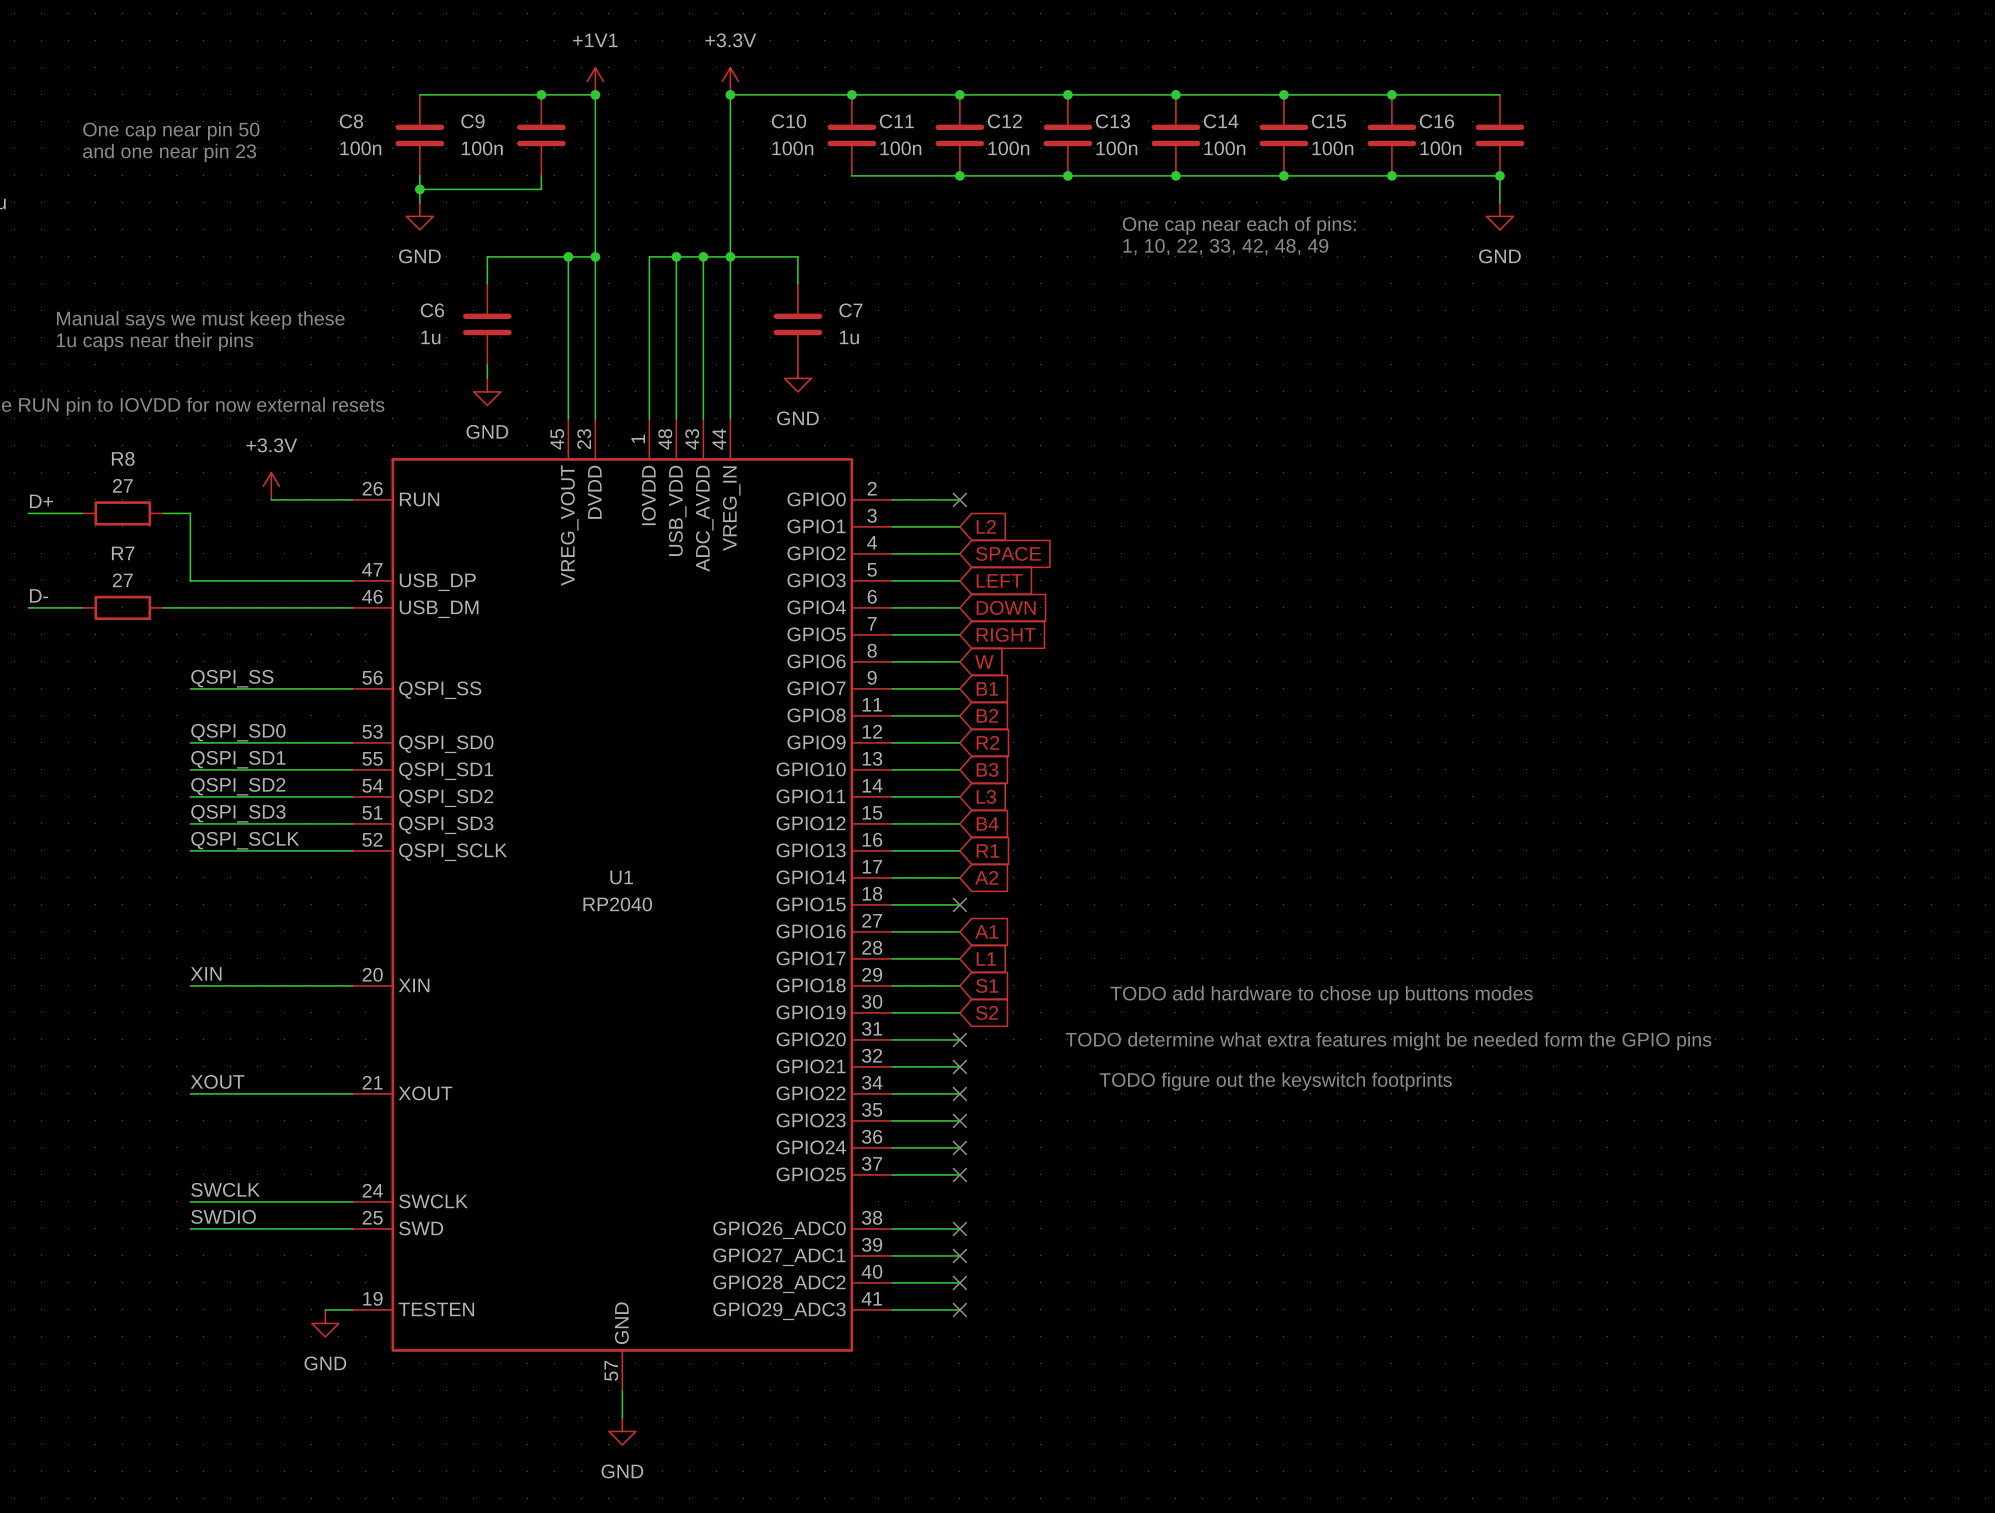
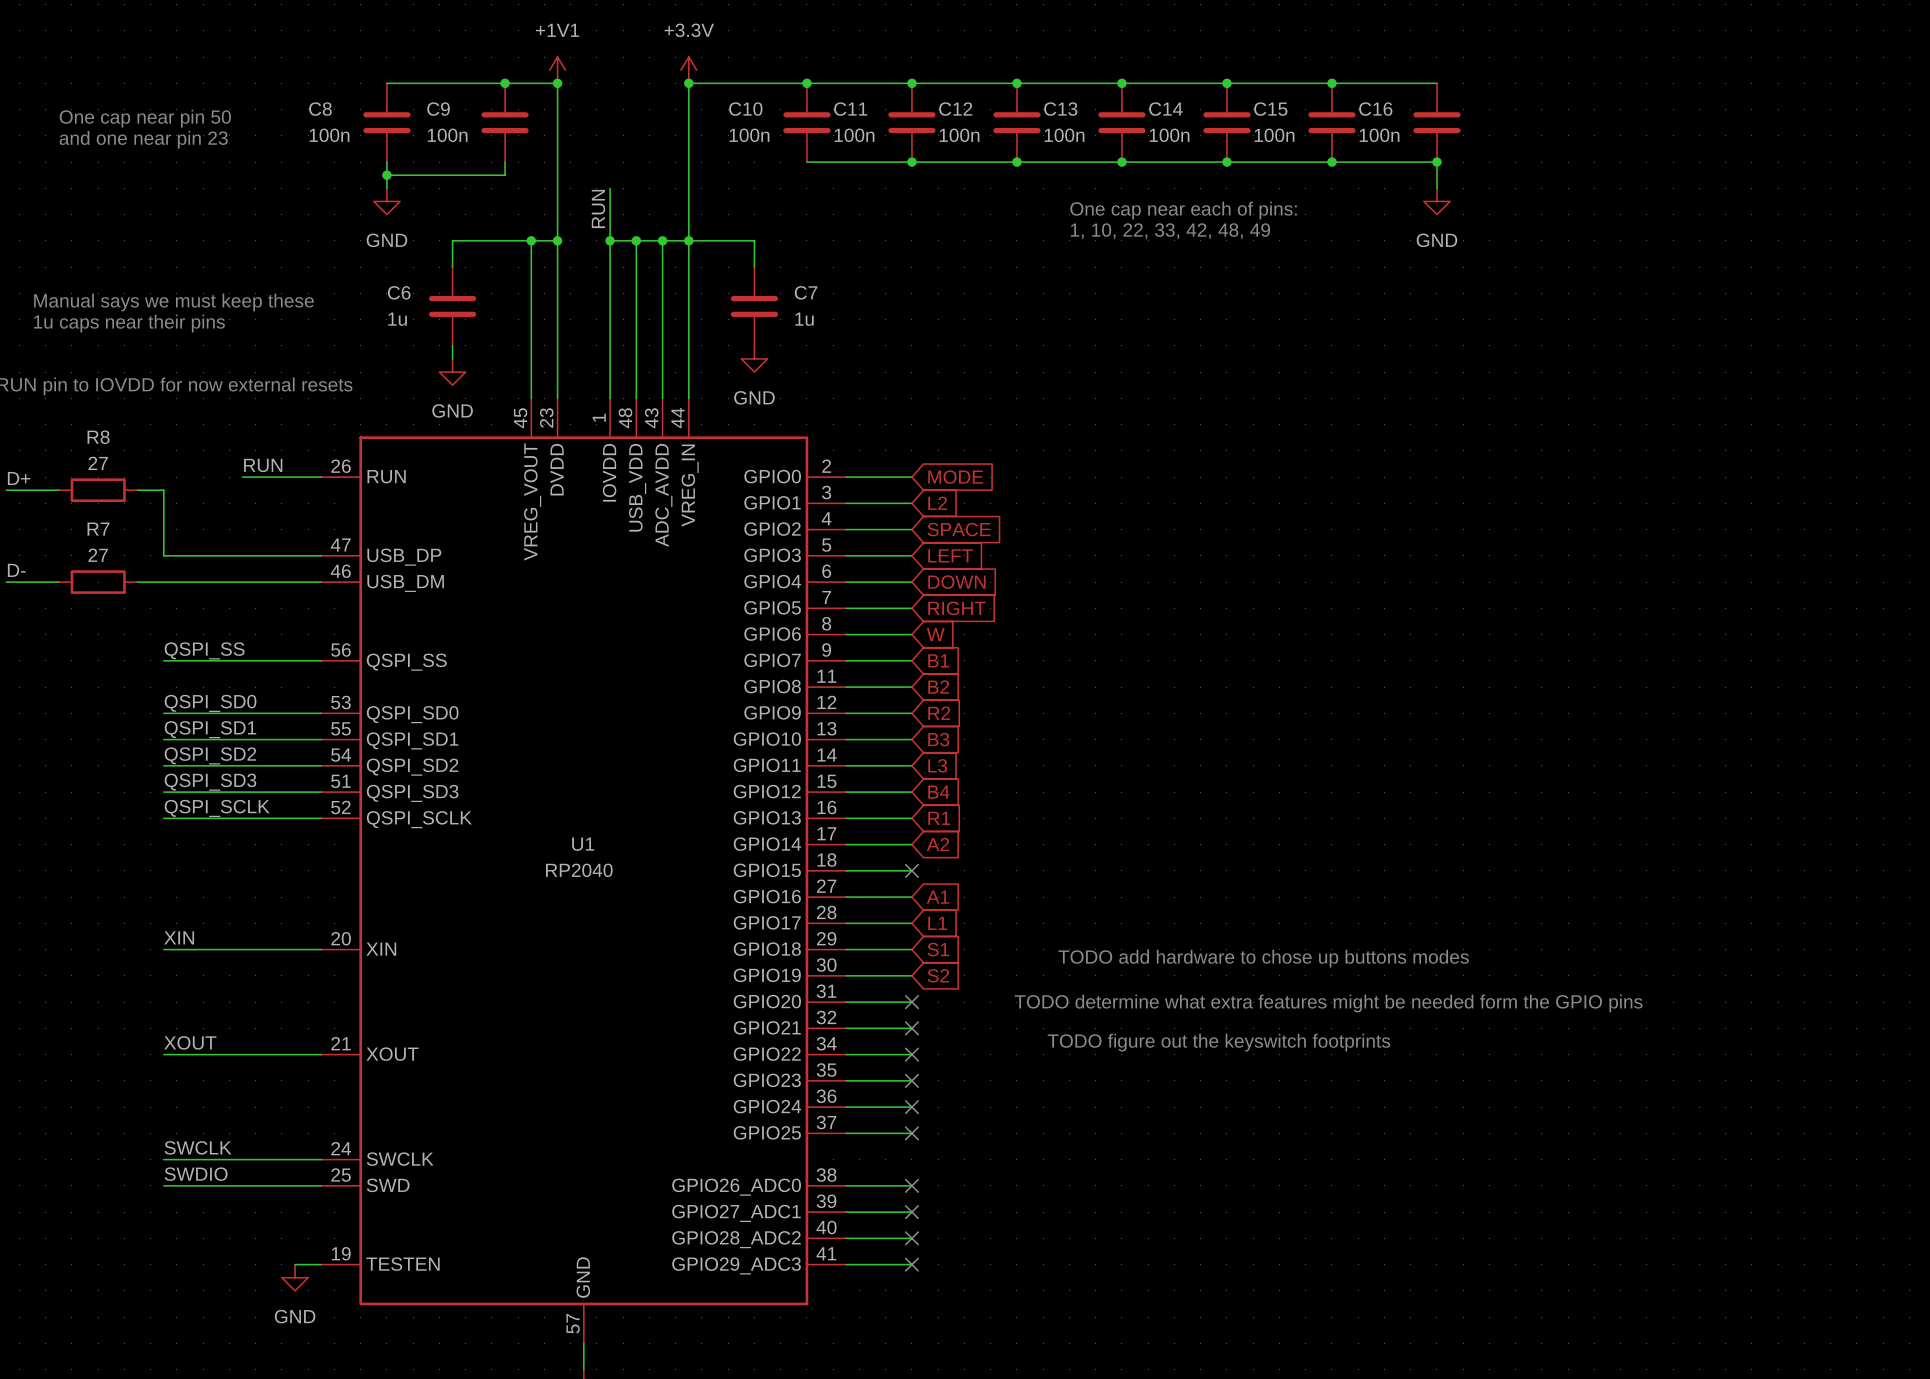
wire: none -> (610, 188) (610, 240)
label: none -> RUN (598, 208)
junction: none -> (610, 240)
power symbol: +3.3V (271, 486) -> none
label: none -> RUN (263, 465)
no-connect mark: (959, 499) -> none
global label: none -> MODE (955, 477)

